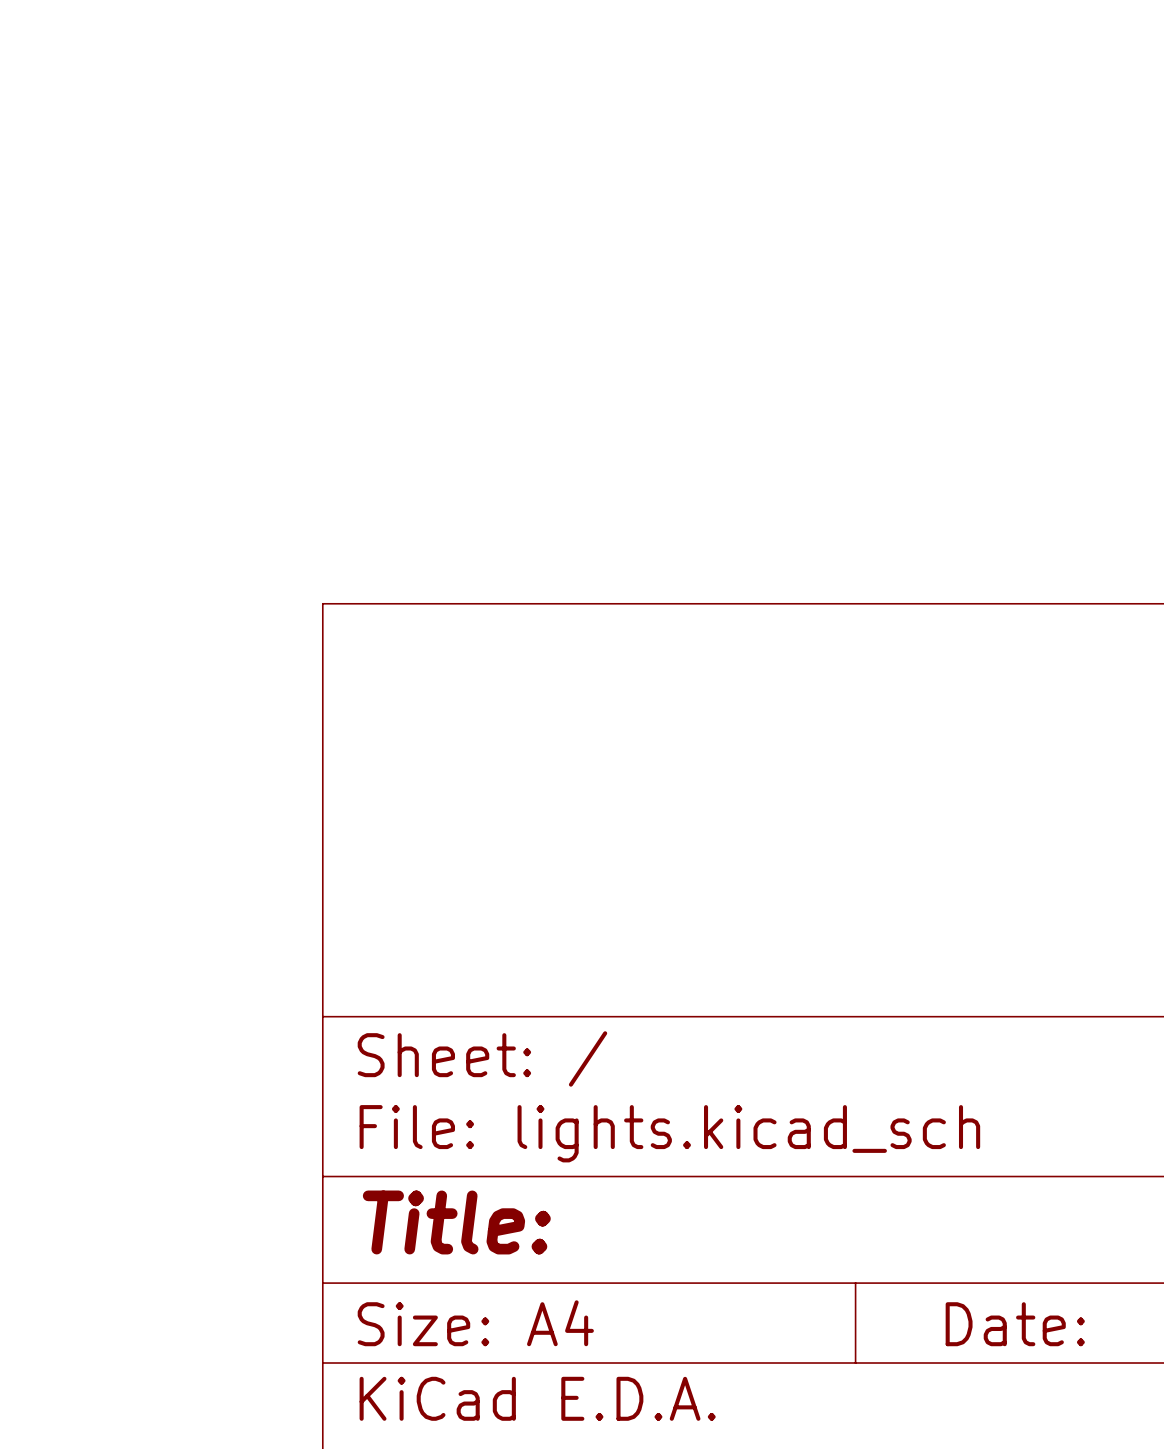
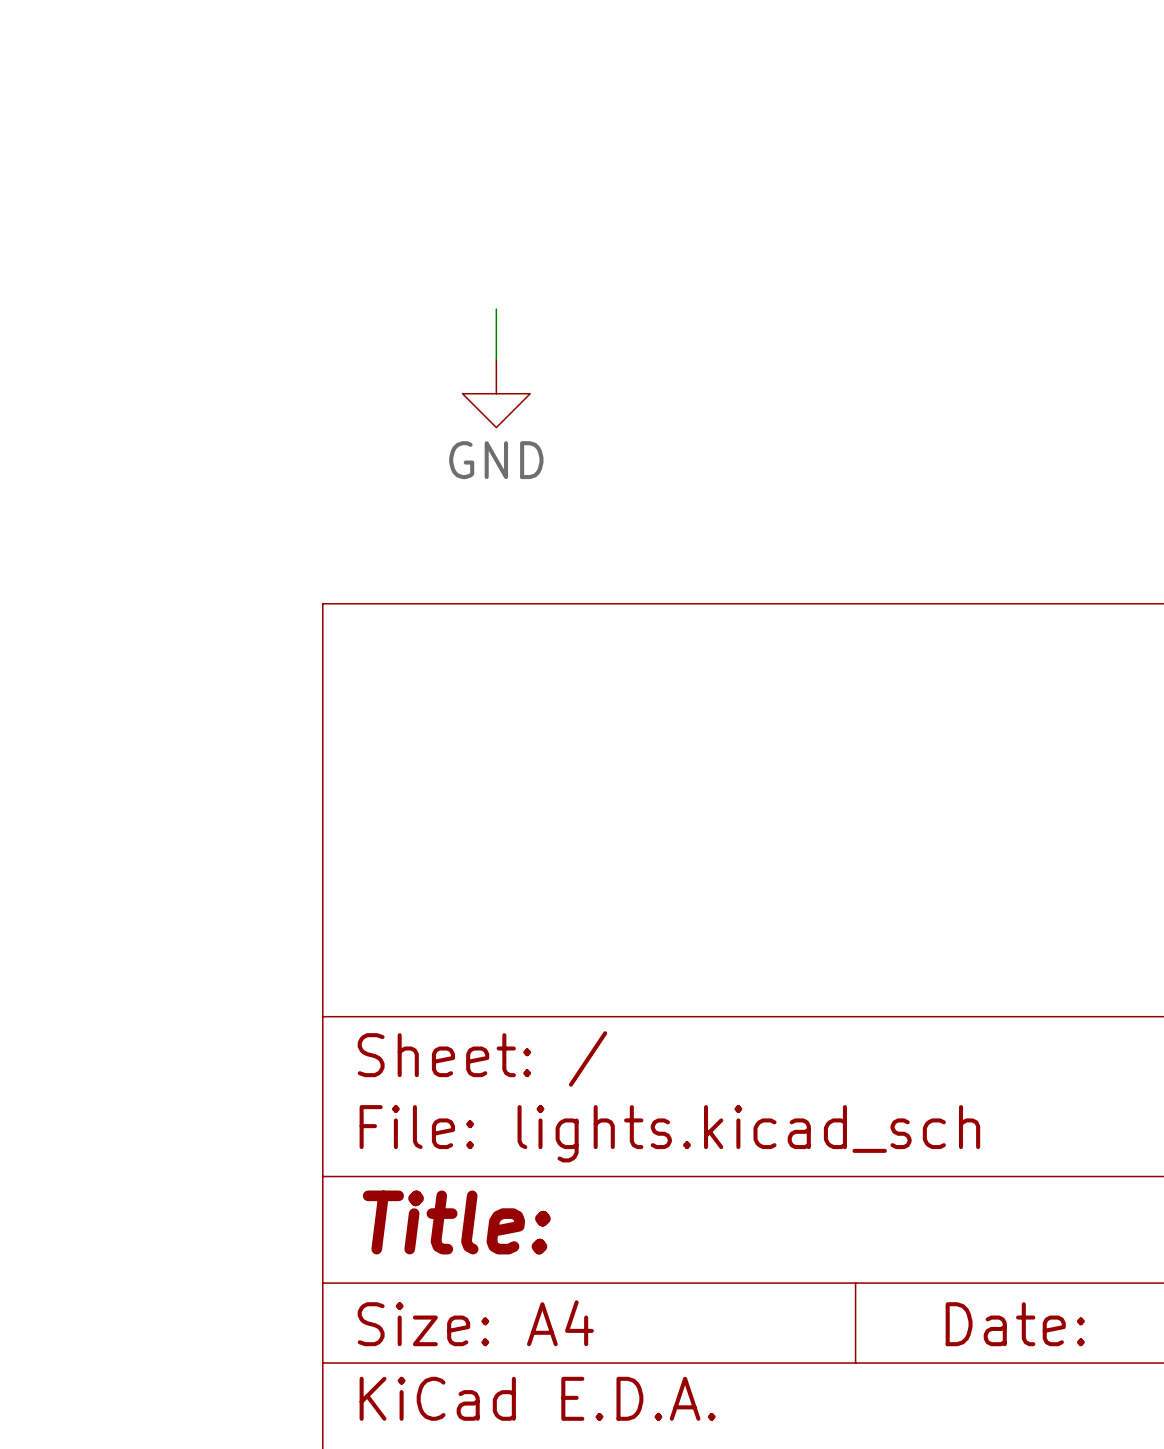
wire: none -> (496, 309) (496, 359)
power symbol: none -> GND (496, 393)

